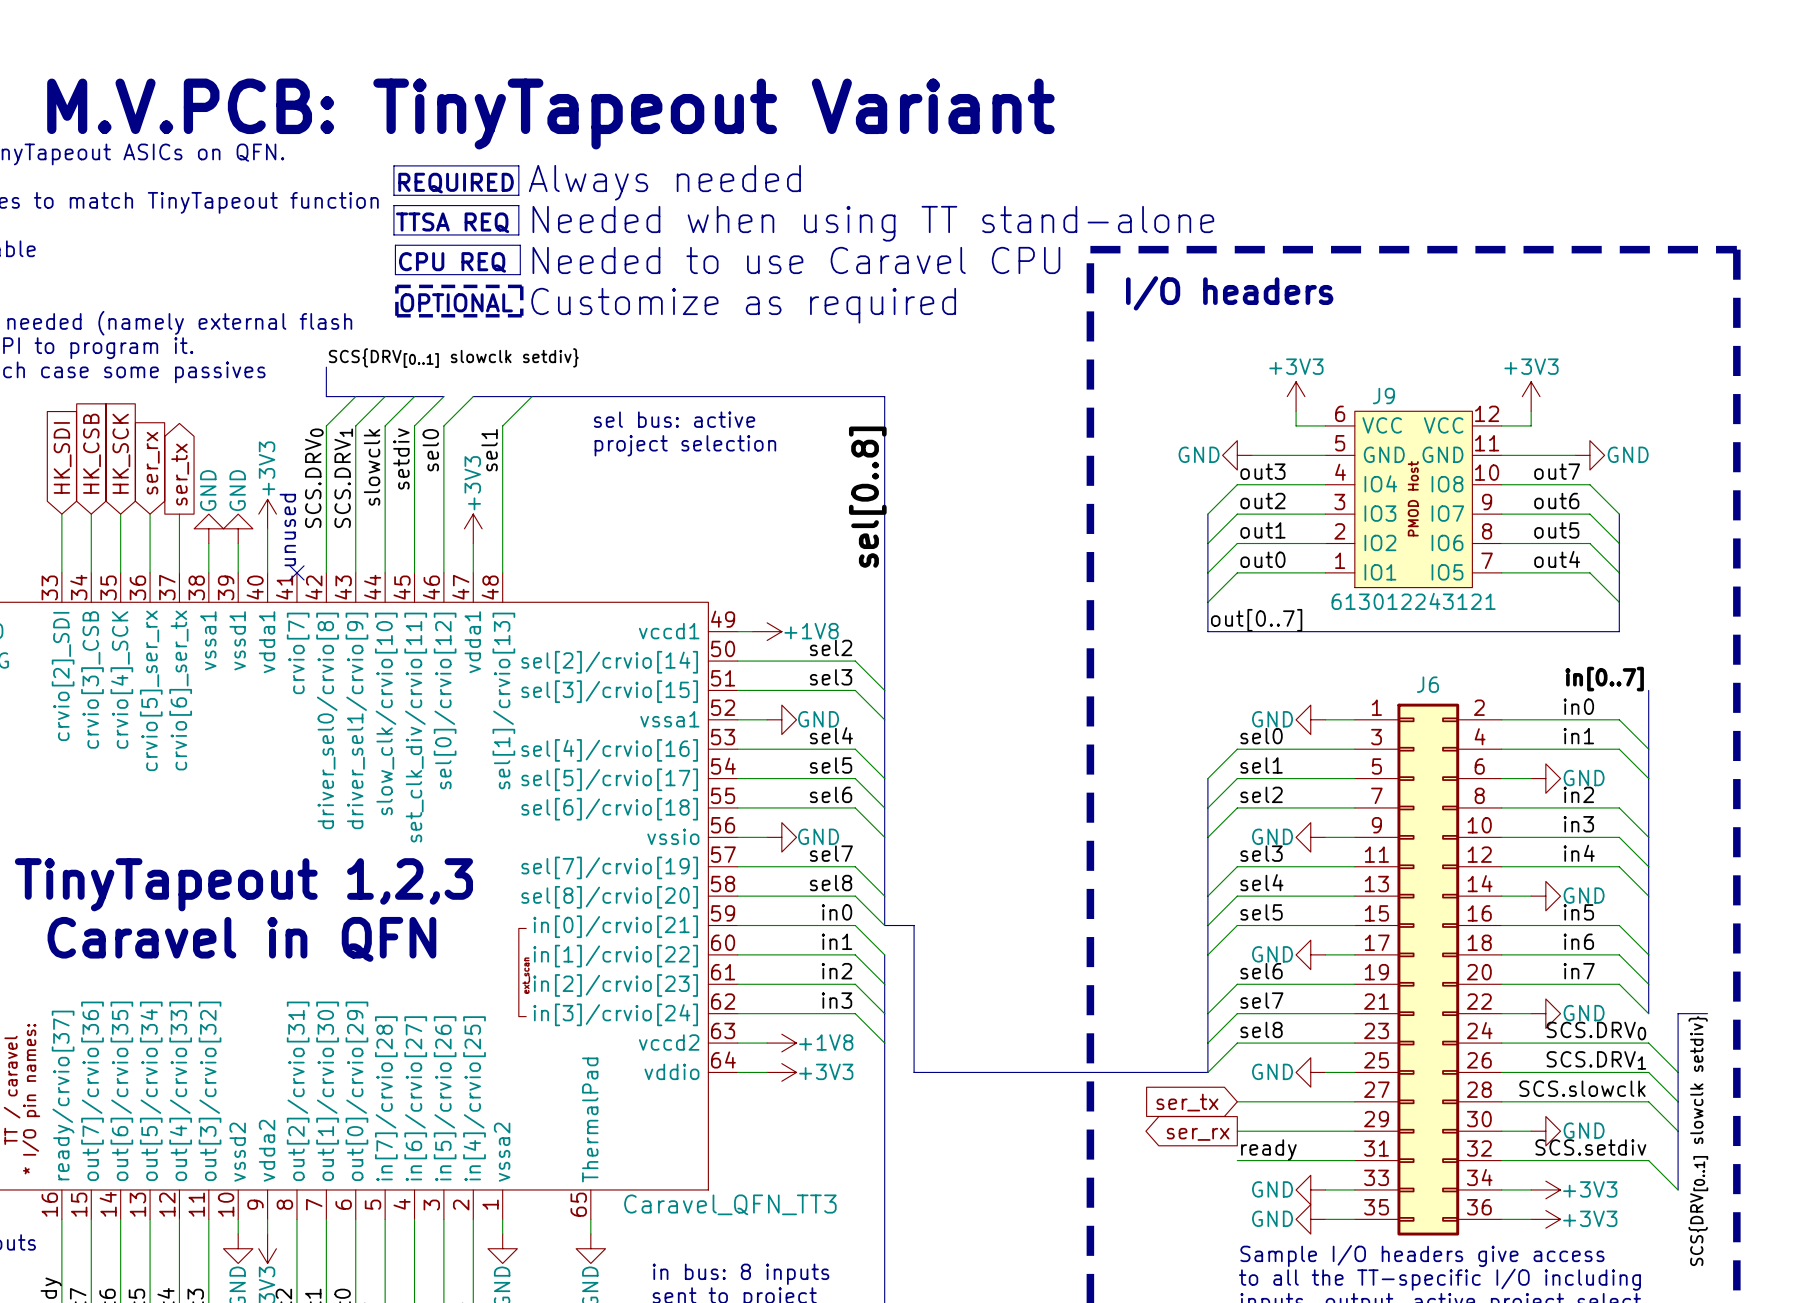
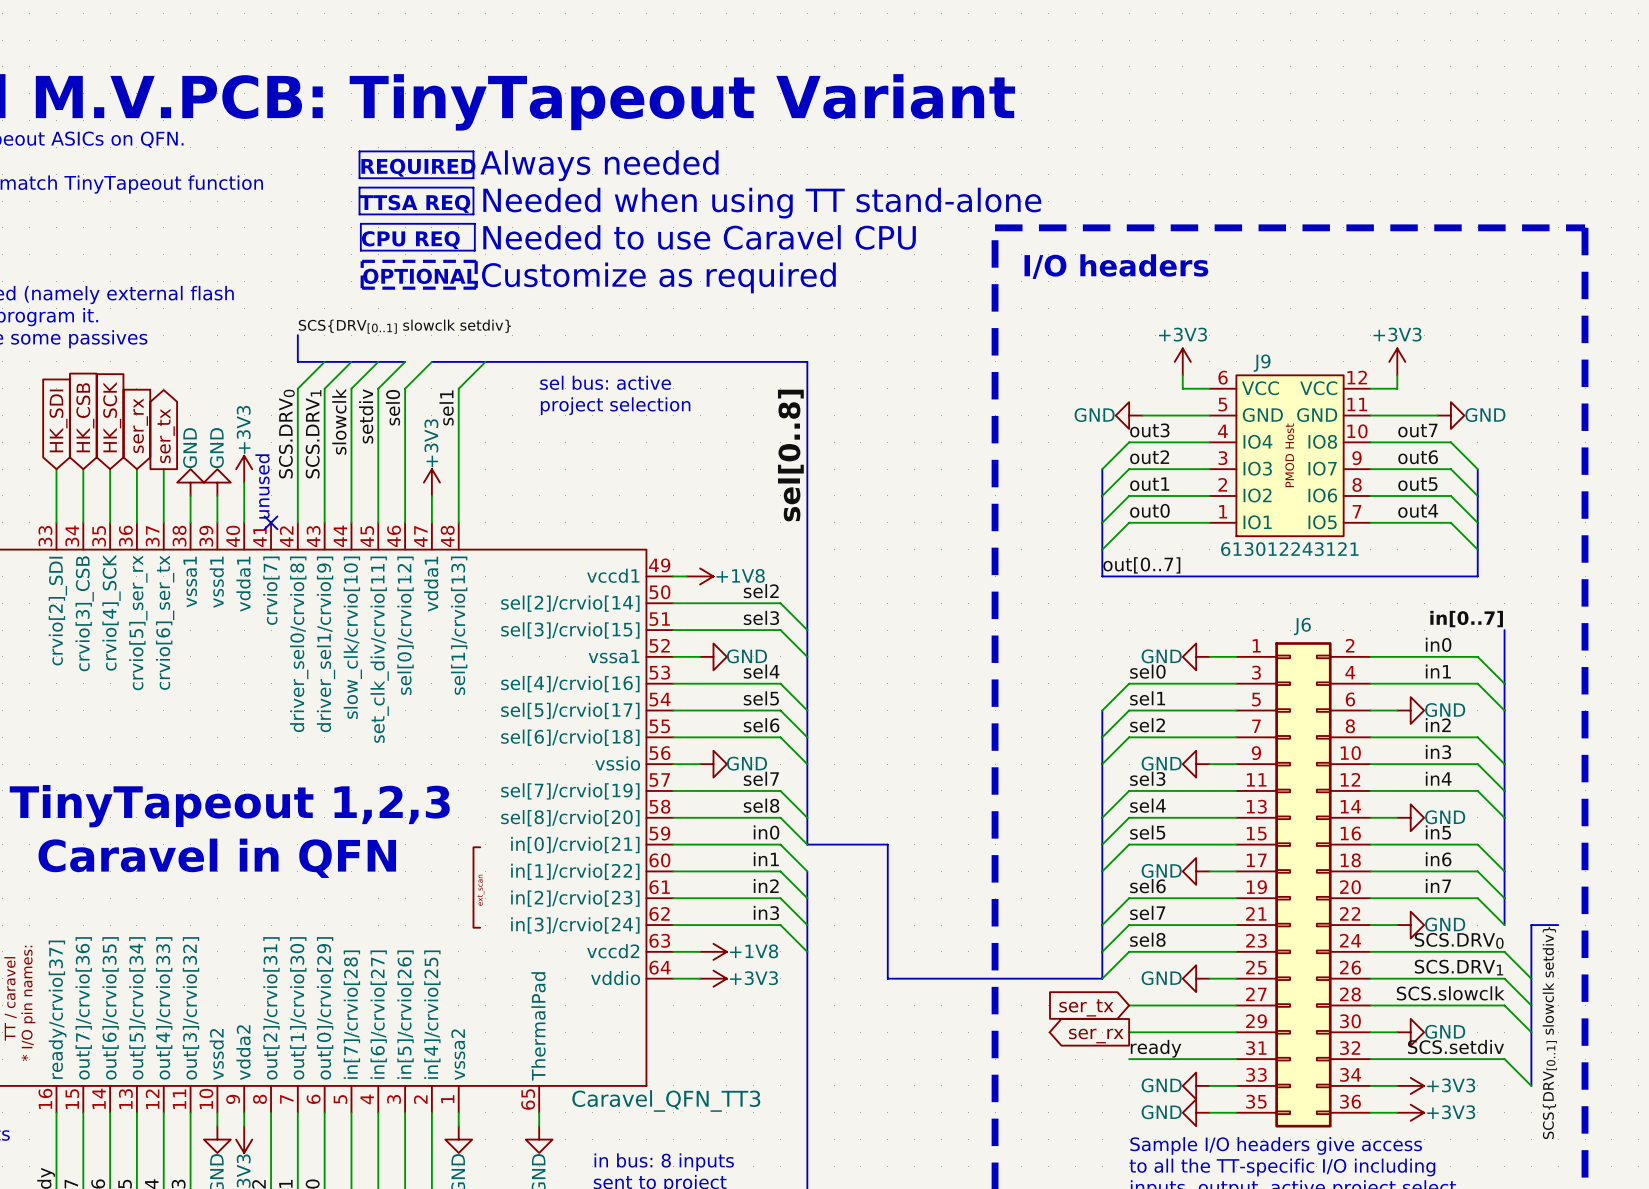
bus: (914, 925) (914, 1072) (972, 1072) -> (834, 844) (887, 844) (887, 978)

